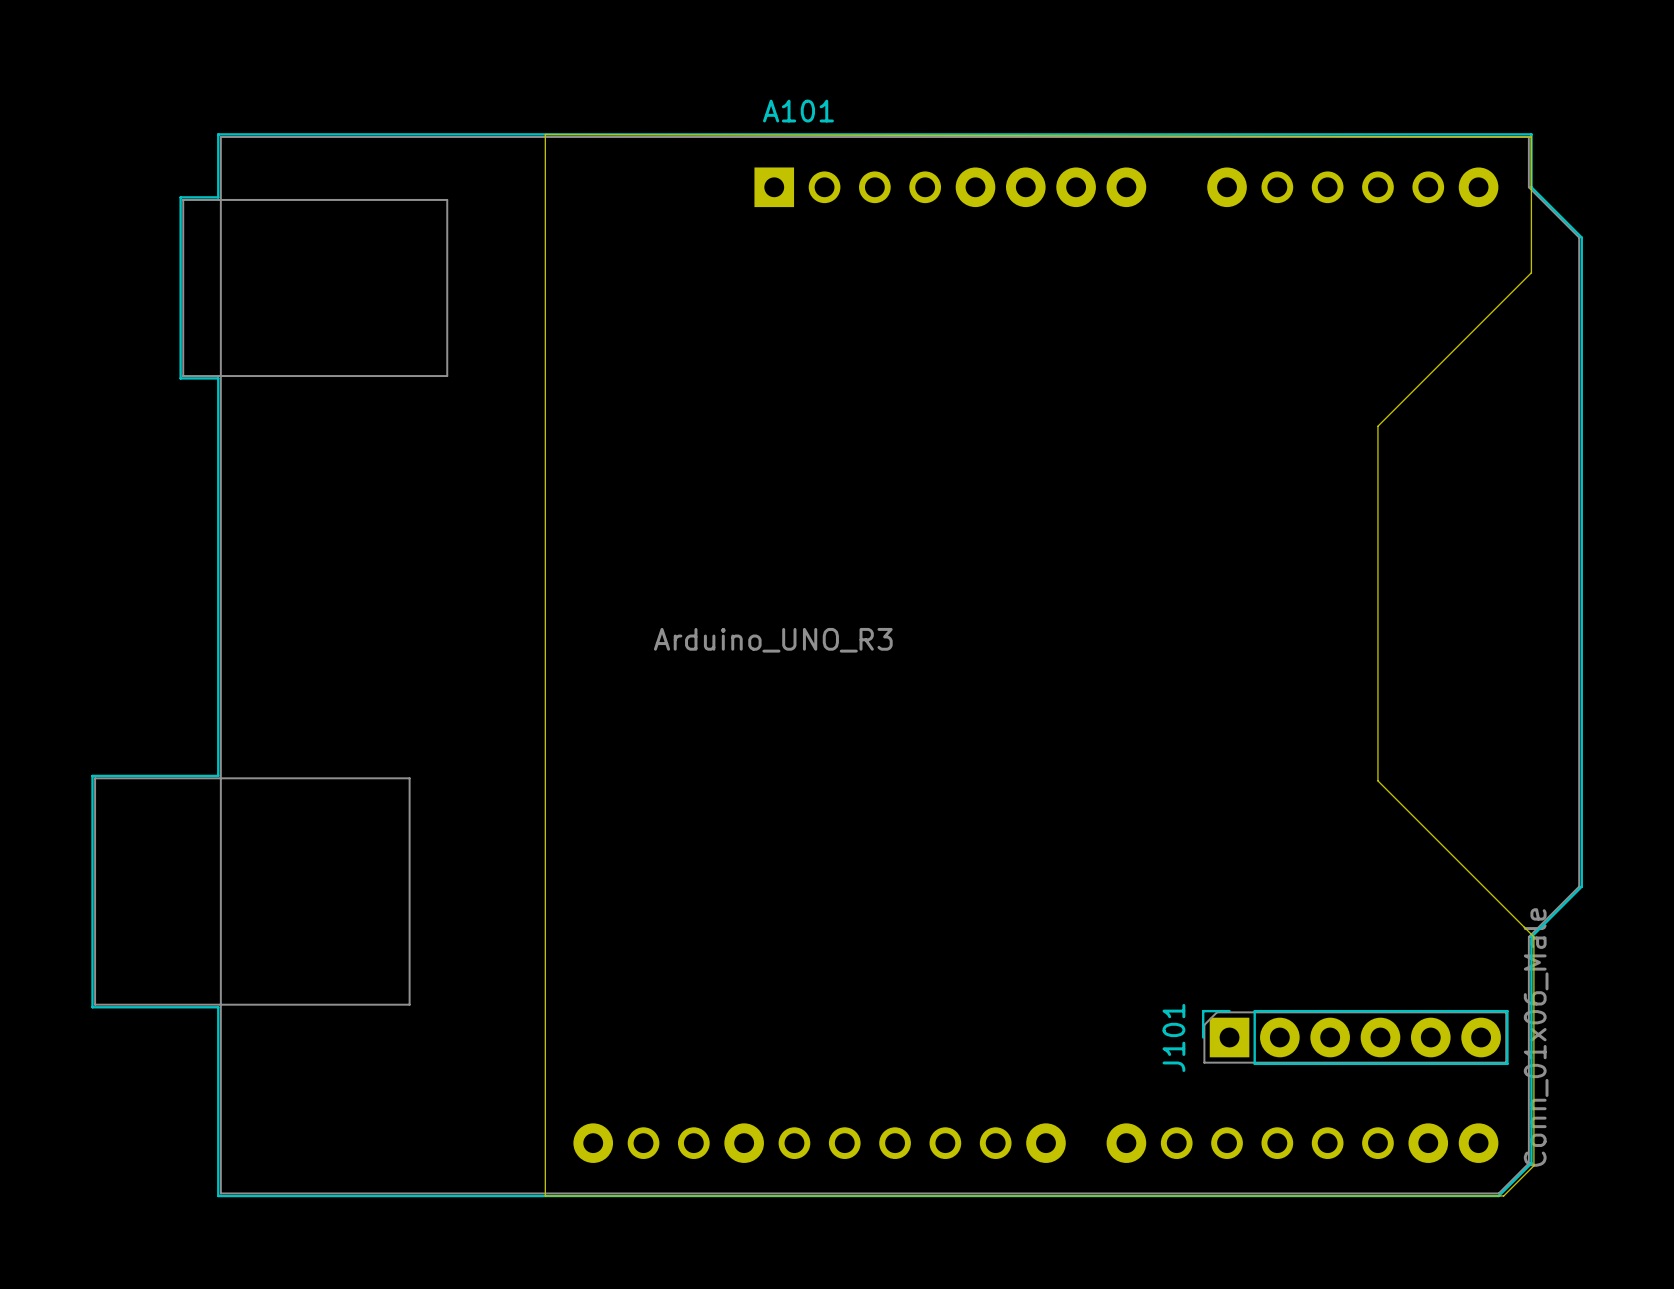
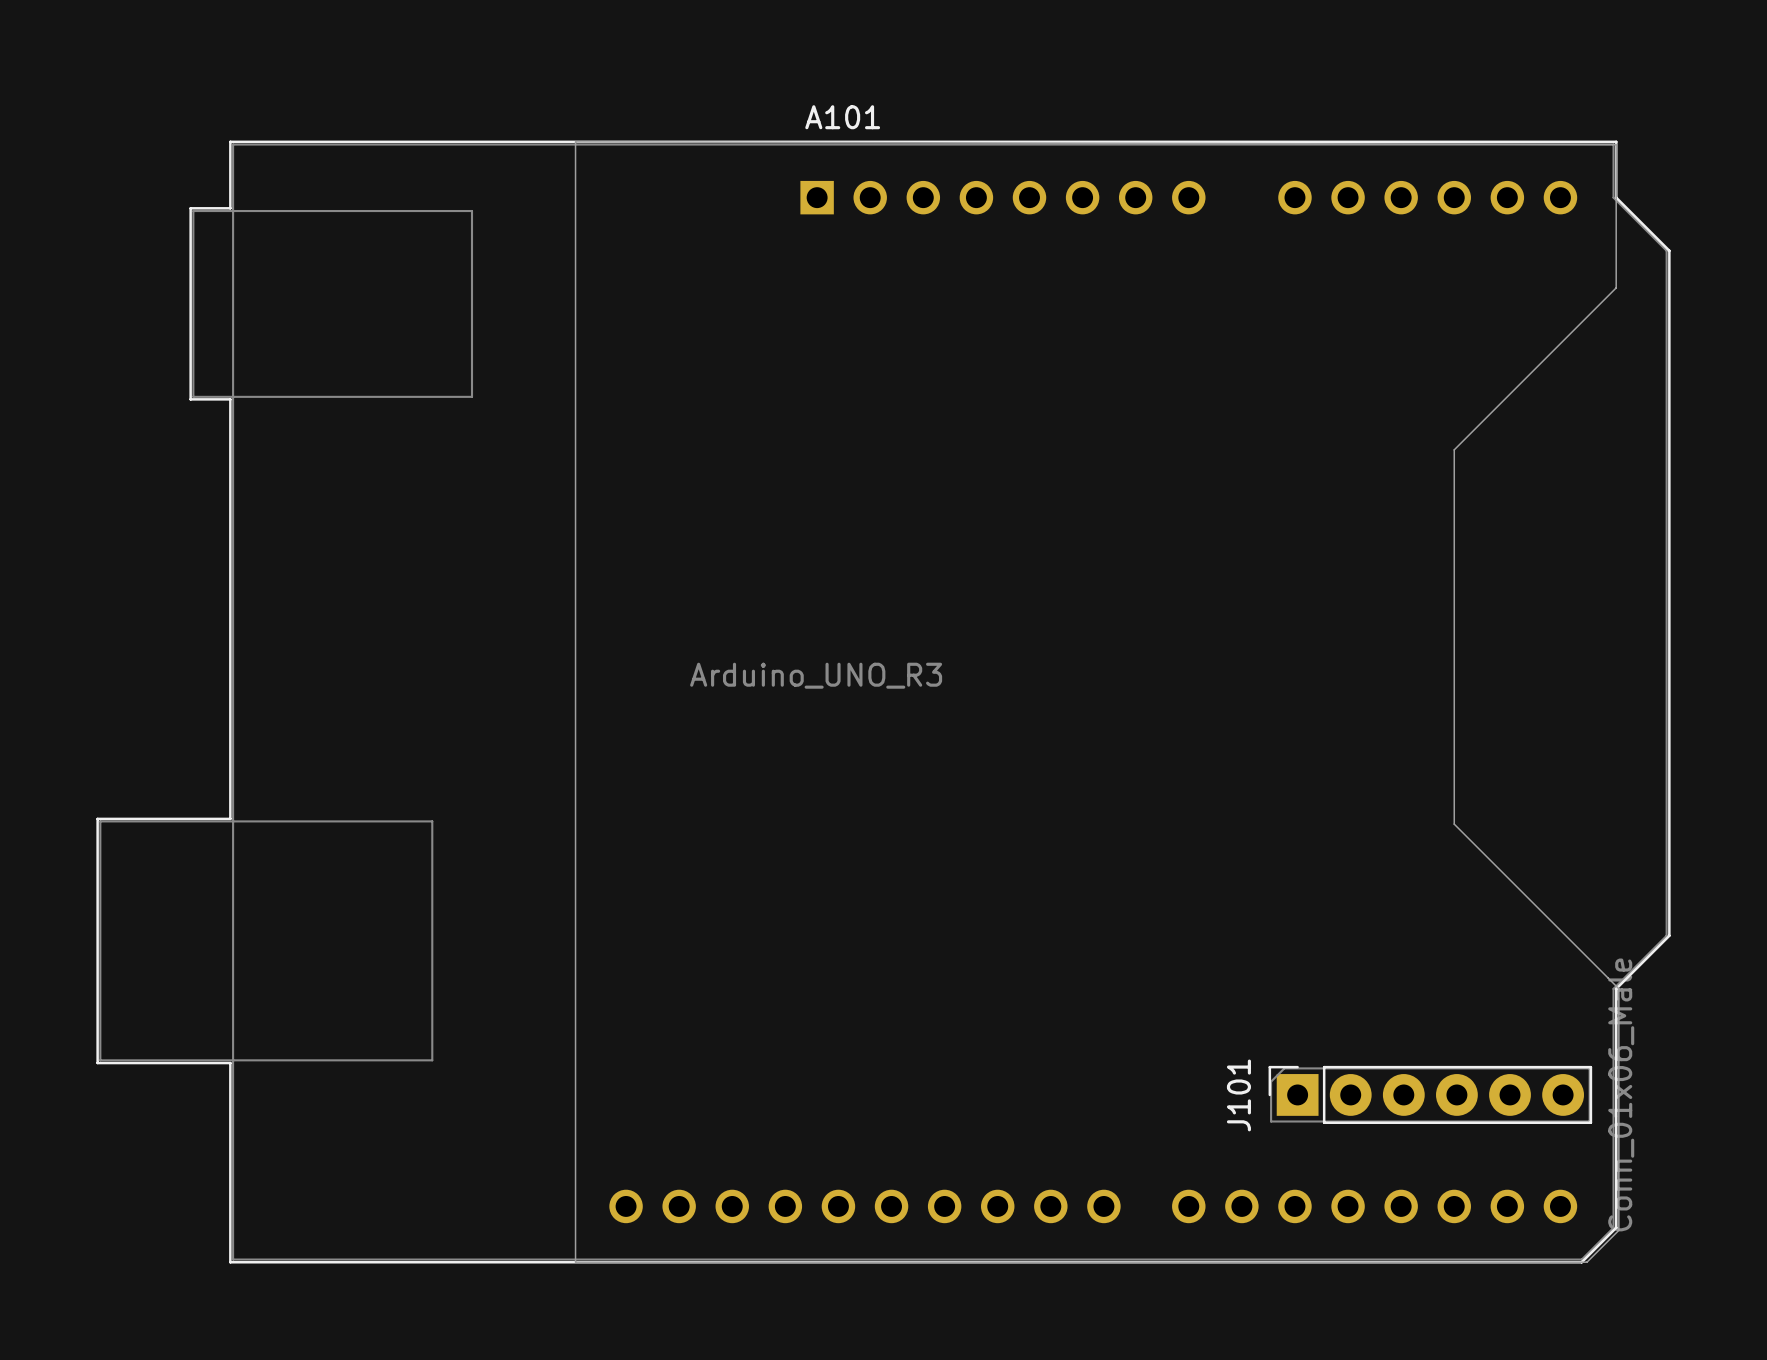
A101 footprint: [91, 133, 1583, 1198] -> [96, 140, 1671, 1264]

